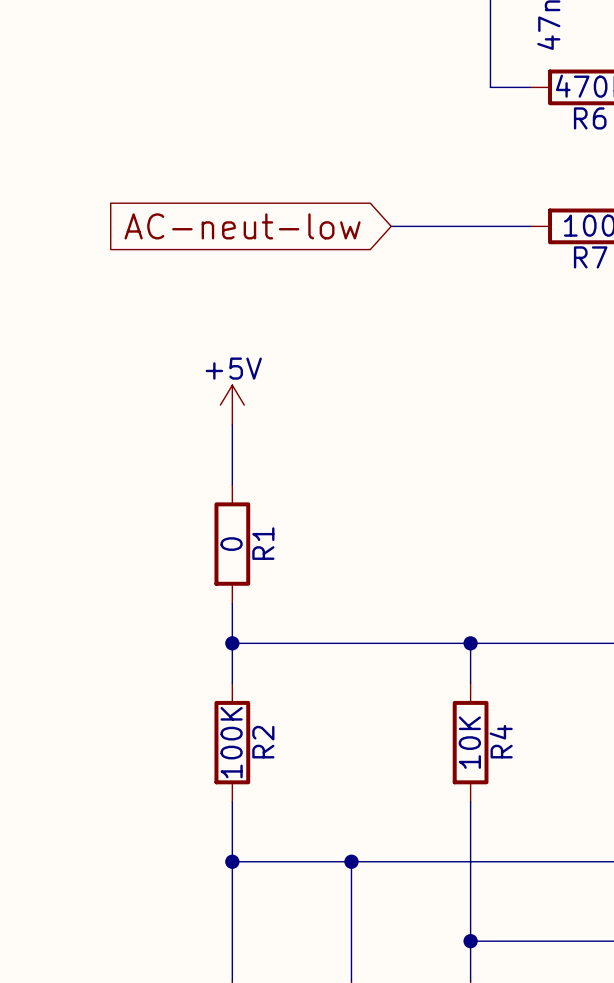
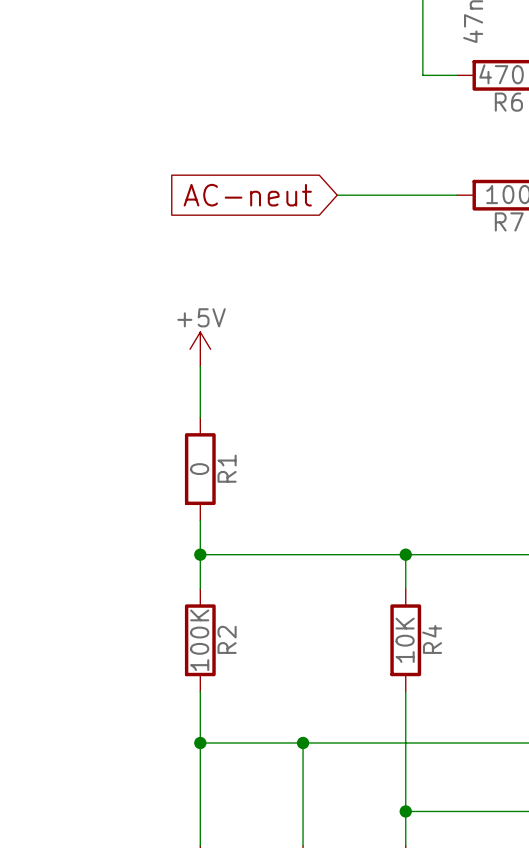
global label: AC-neut-low (242, 226) -> AC-neut (247, 195)

